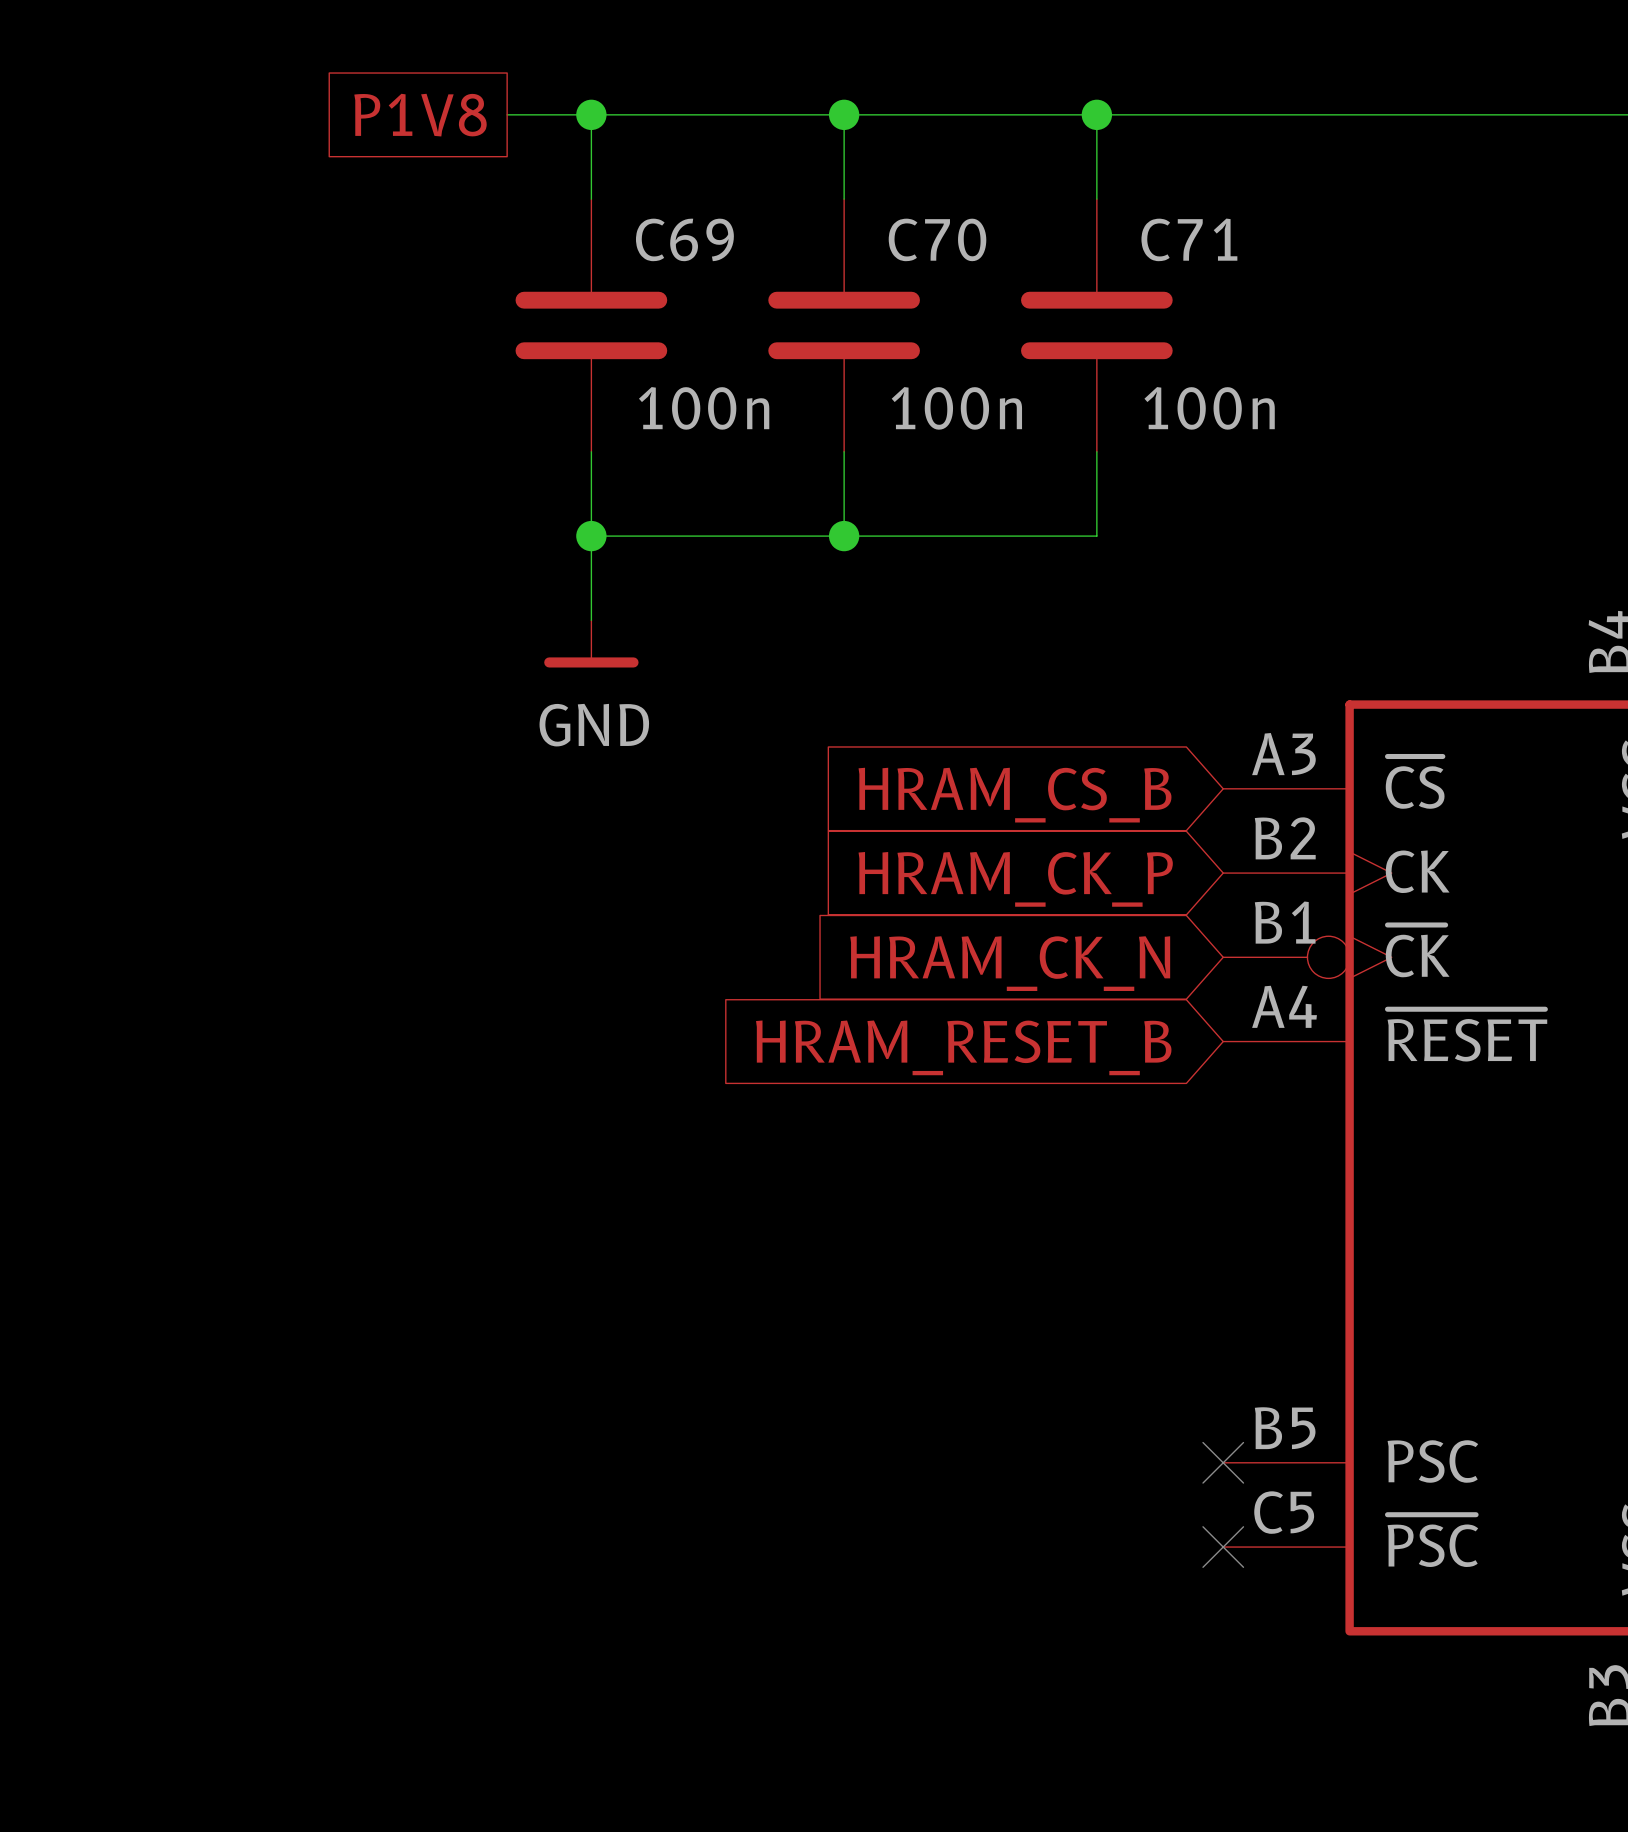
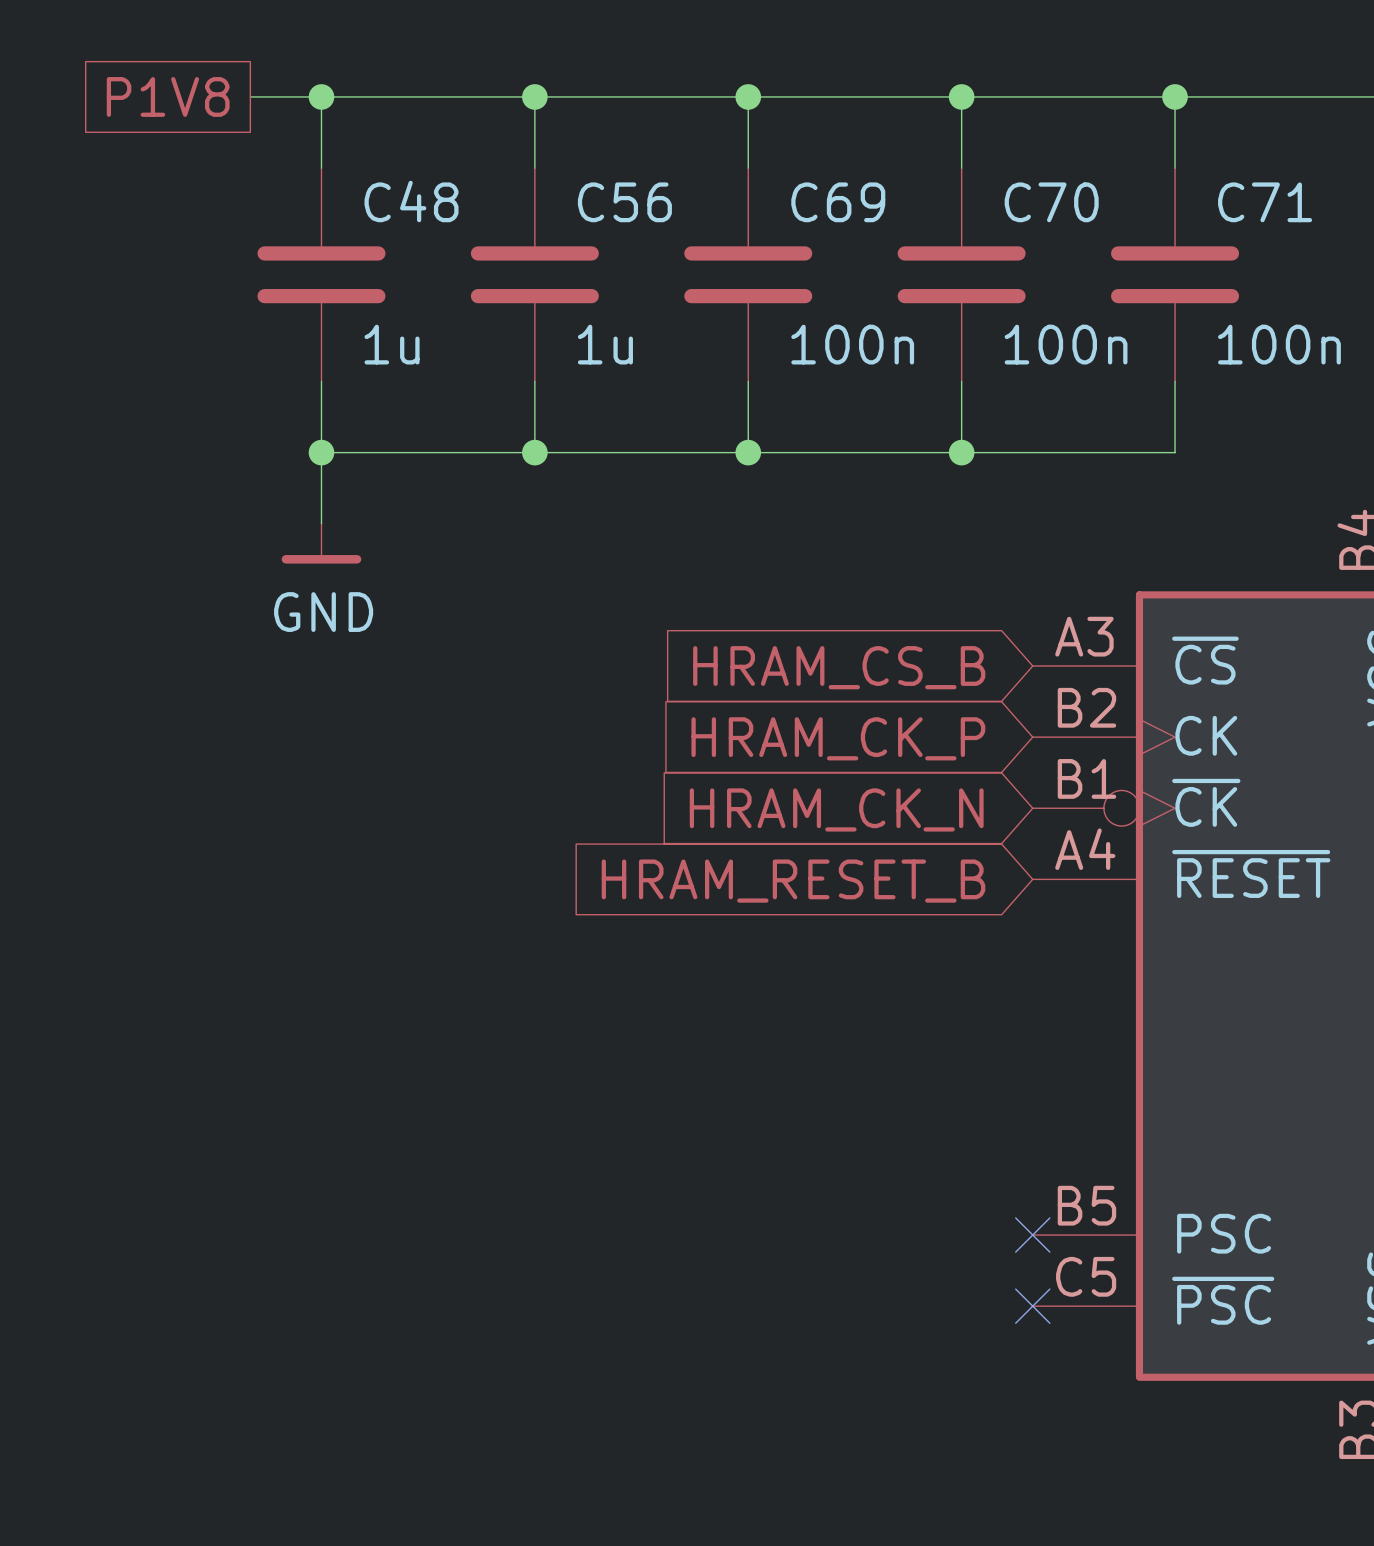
wire: none -> (250, 96) (428, 96)
junction: none -> (321, 96)
wire: (591, 114) (591, 199) -> (321, 96) (321, 168)
junction position: (591, 114) -> (534, 96)
wire: (844, 114) (844, 199) -> (534, 96) (534, 168)
junction position: (844, 114) -> (748, 96)
wire: (1096, 114) (1096, 199) -> (748, 96) (748, 168)
junction position: (1096, 114) -> (961, 96)
wire: none -> (961, 96) (961, 168)
wire: none -> (1175, 96) (1175, 168)
junction: none -> (1175, 96)
global label position: P1V8 (420, 115) -> P1V8 (168, 96)
C48: none -> 1u (321, 274)
C69 position: (591, 325) -> (748, 274)
C56: none -> 1u (534, 274)
C70 position: (844, 325) -> (961, 274)
C71 position: (1096, 325) -> (1175, 274)
wire: (591, 451) (591, 620) -> (321, 381) (321, 523)
wire: (844, 451) (844, 536) -> (534, 381) (534, 452)
wire: none -> (748, 381) (748, 452)
wire: (1096, 451) (1096, 536) -> (1175, 381) (1175, 452) (926, 452)
wire: none -> (961, 381) (961, 452)
wire: none -> (321, 452) (499, 452)
junction: none -> (321, 452)
junction position: (591, 536) -> (534, 452)
junction position: (844, 536) -> (748, 452)
junction: none -> (961, 452)
power symbol position: GND (591, 643) -> GND (321, 543)

